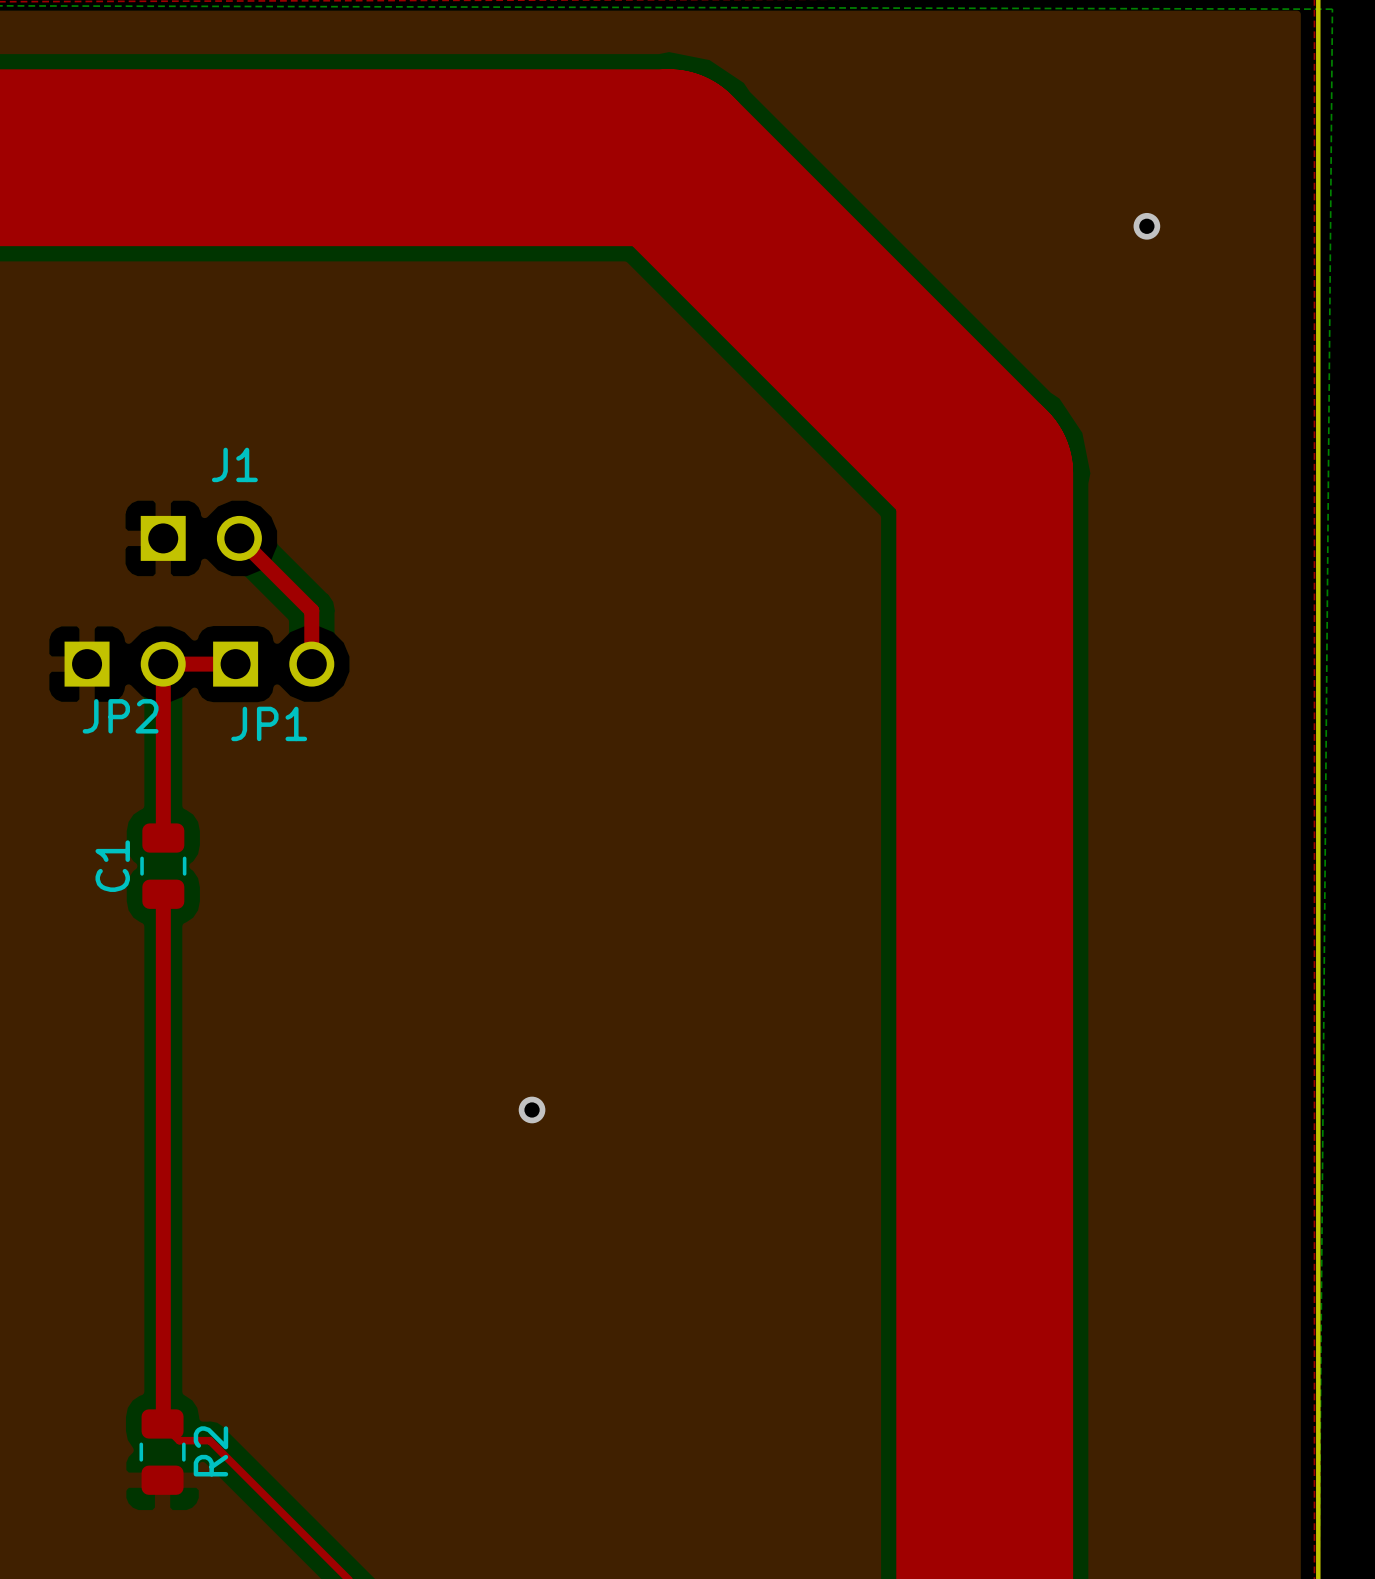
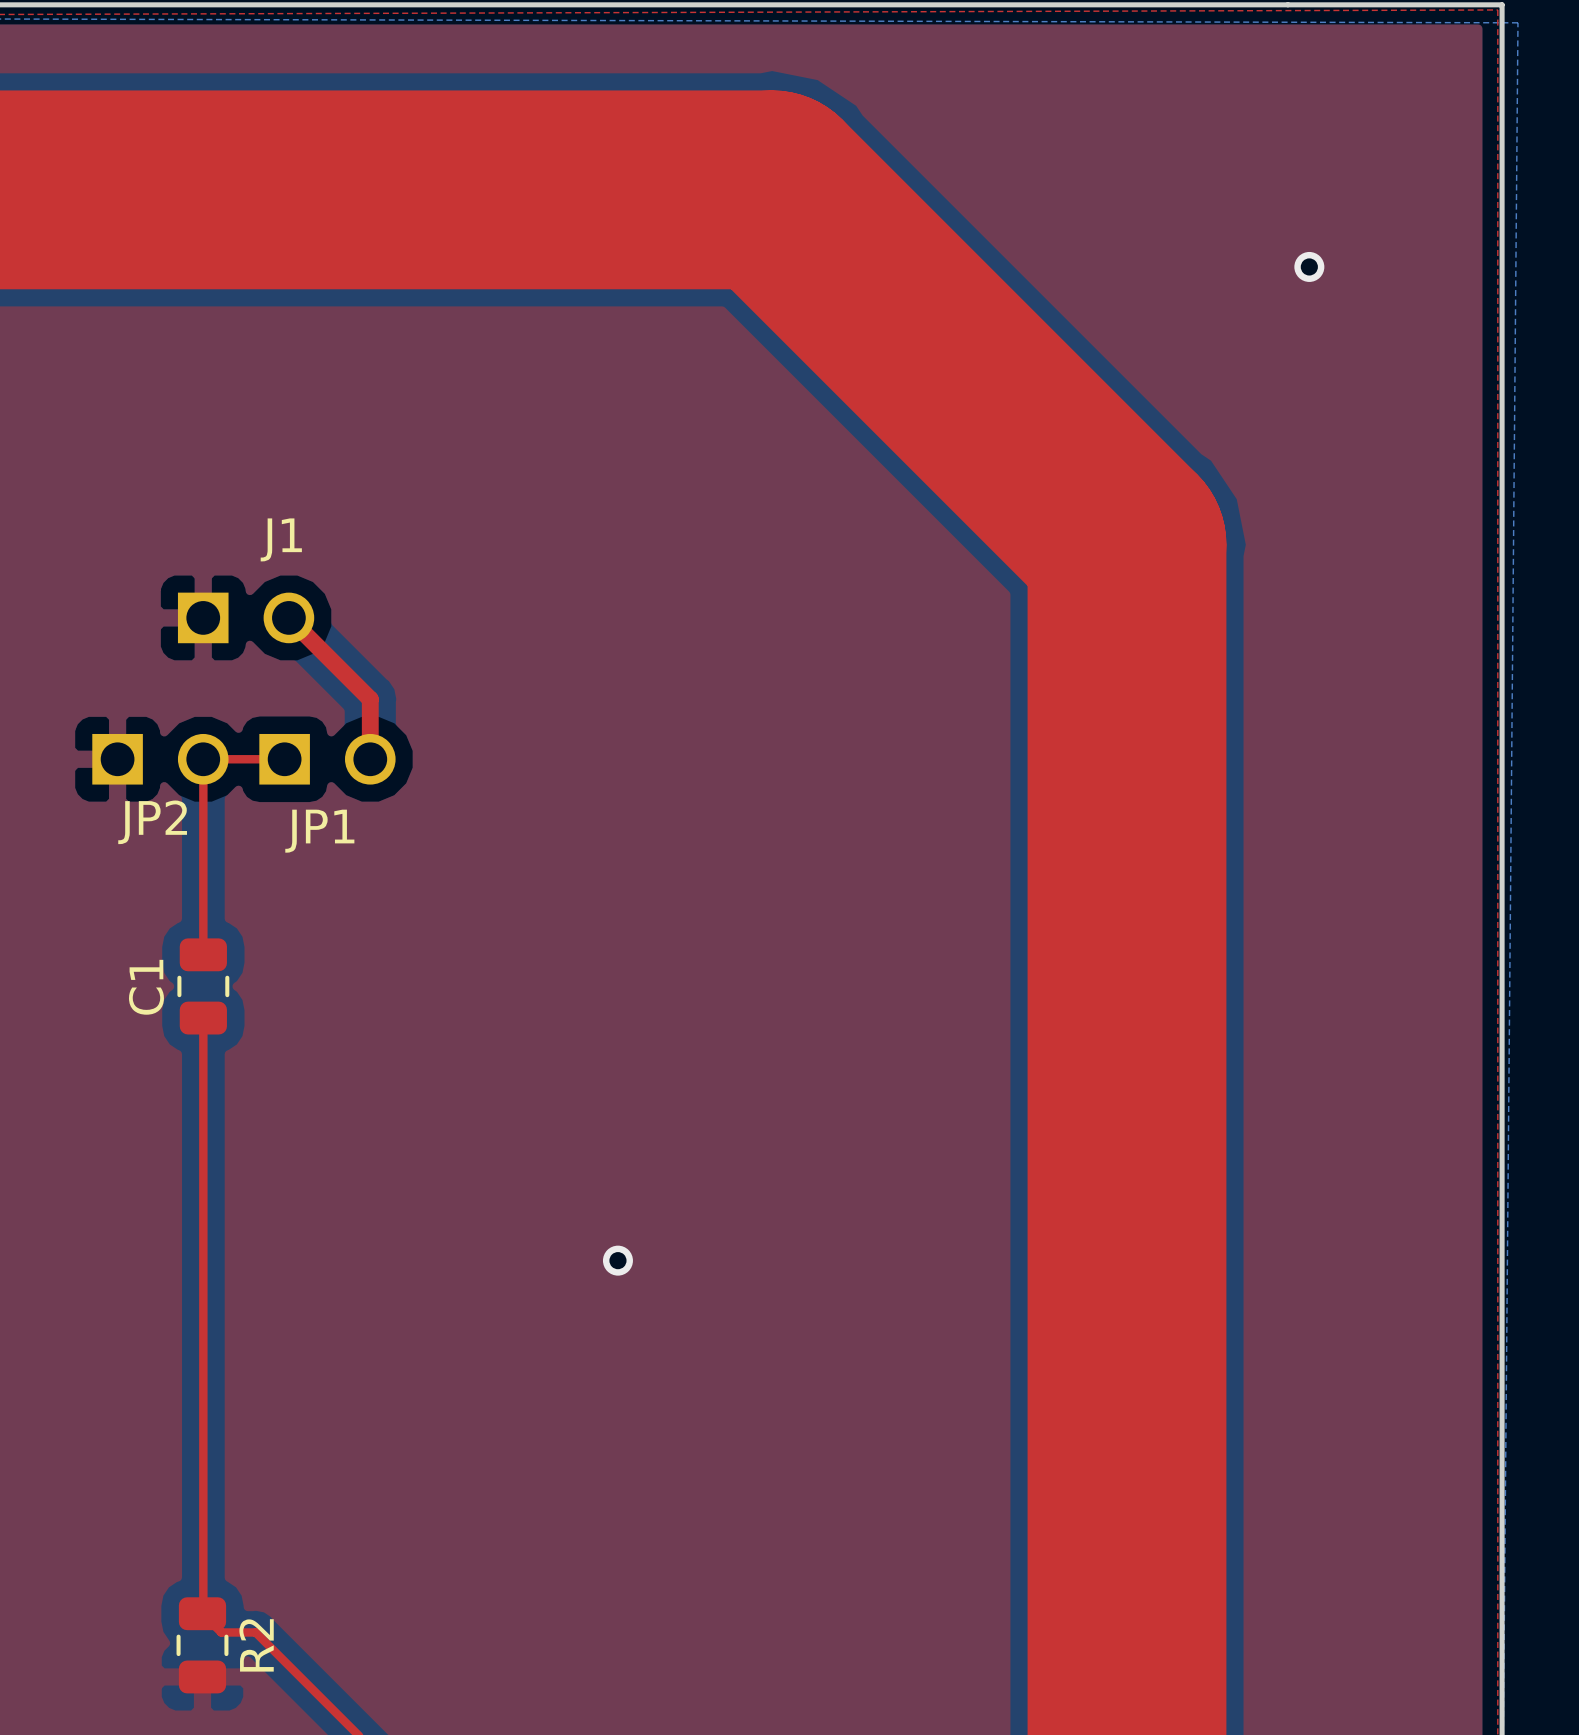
top track width: thick (235, 664) (163, 664) (163, 838) -> thin (284, 759) (203, 759) (203, 954)
top track width: thick (163, 894) (163, 1423) -> thin (203, 1018) (203, 1612)

